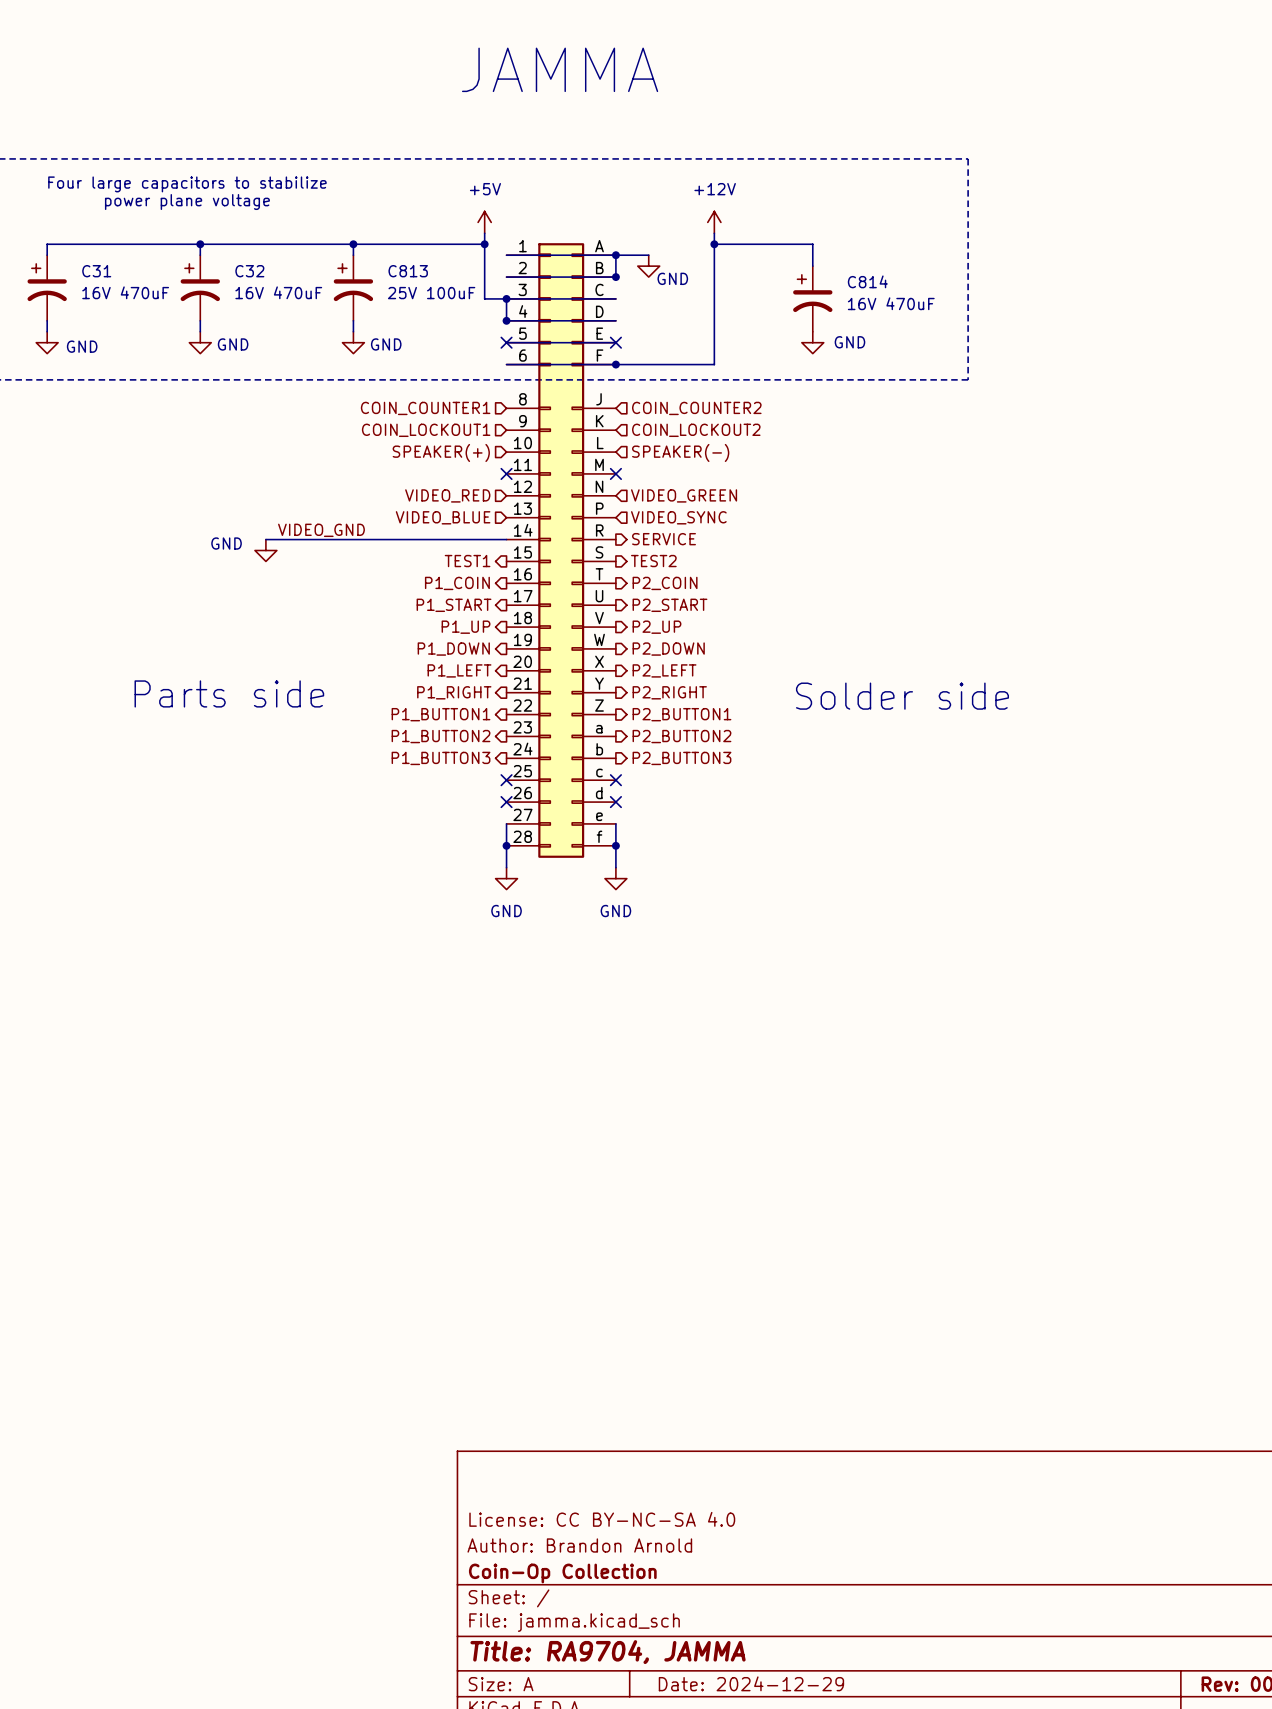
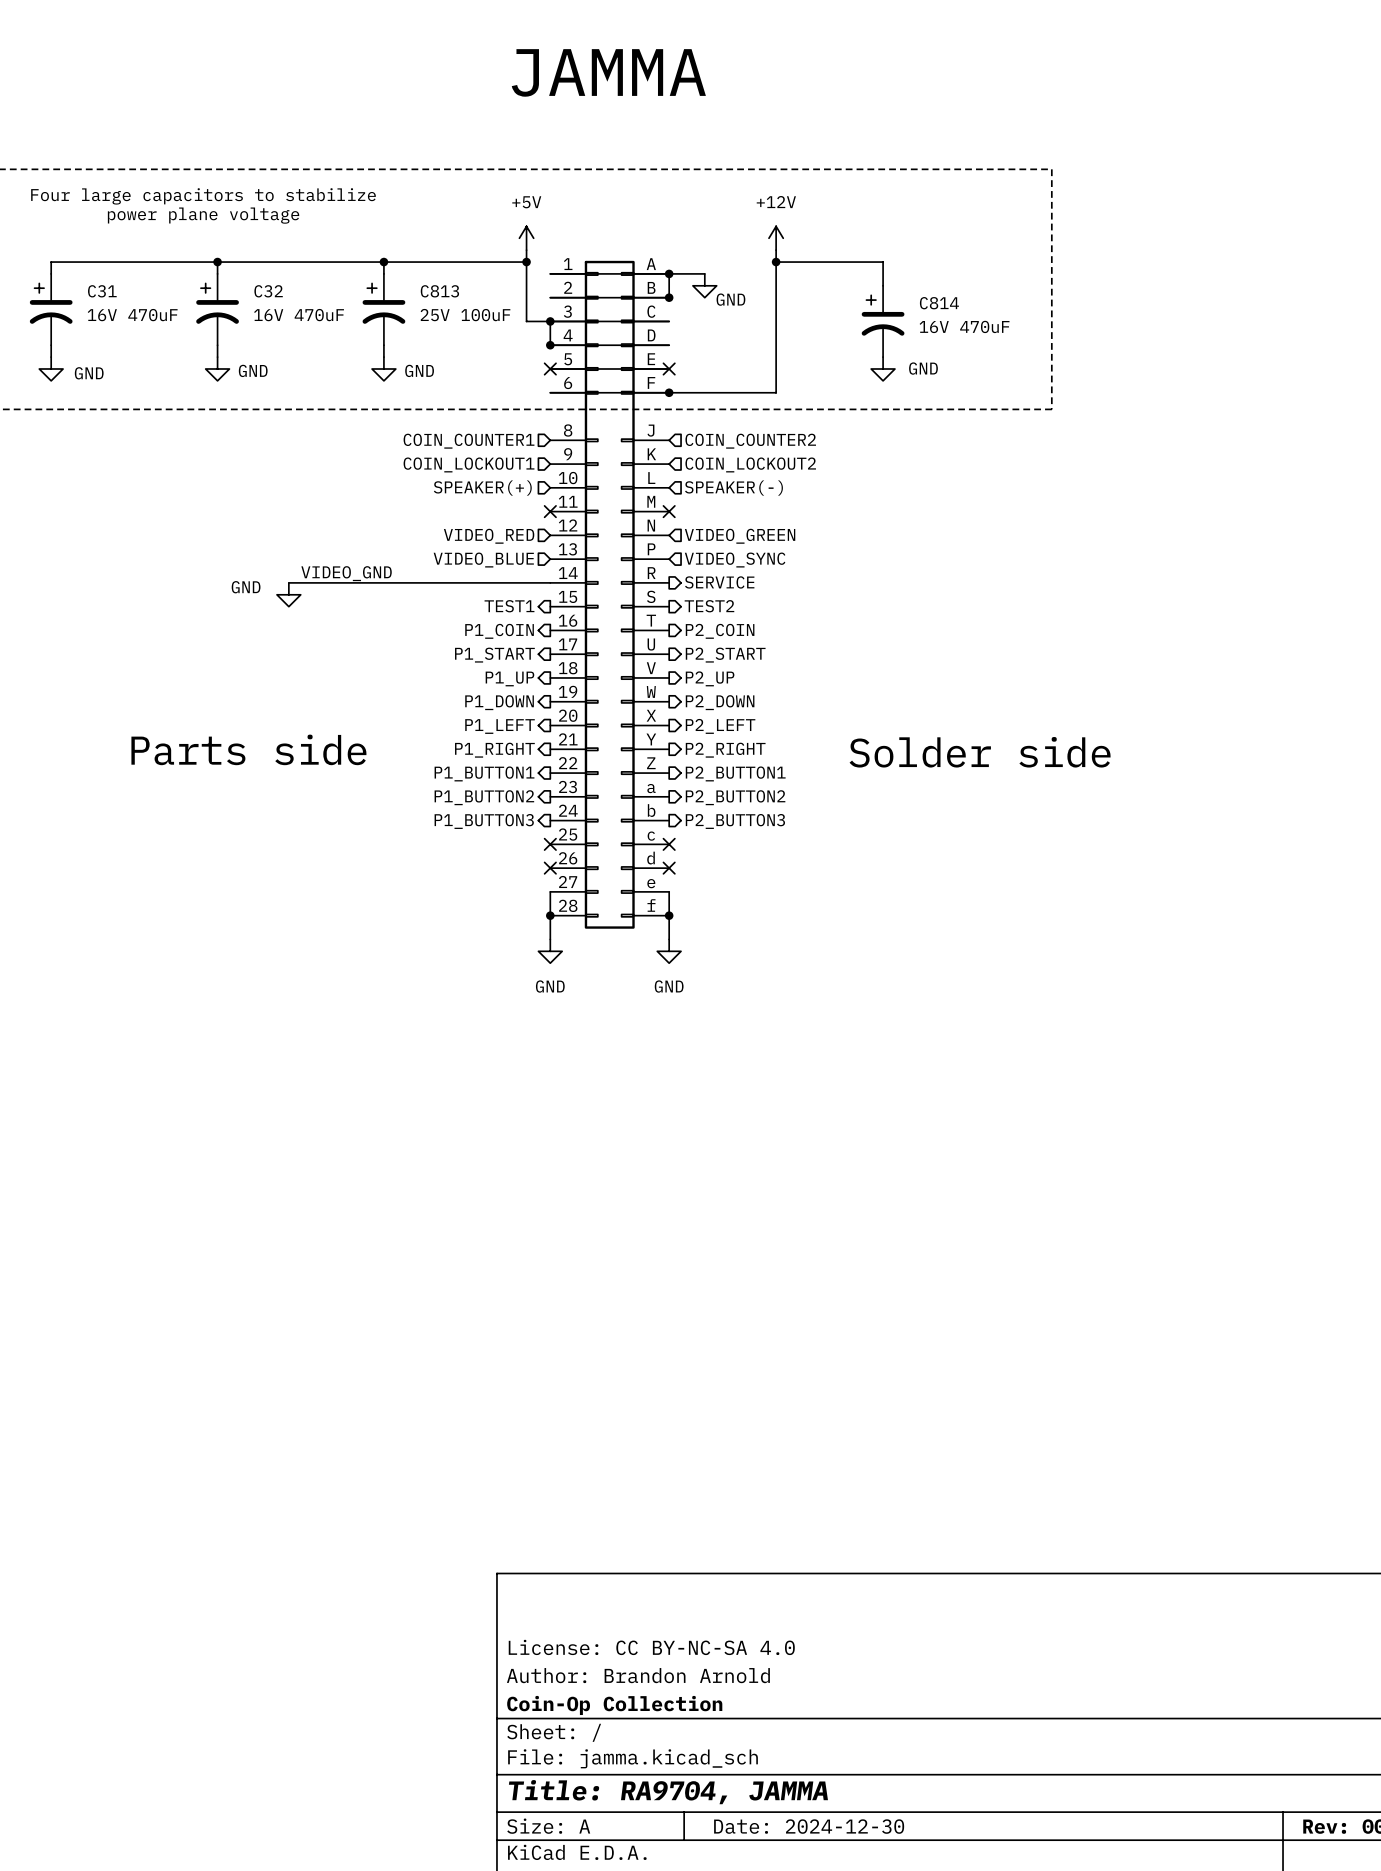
title block: Date: 2024-12-29 (751, 1683) -> Date: 2024-12-30 (809, 1826)

